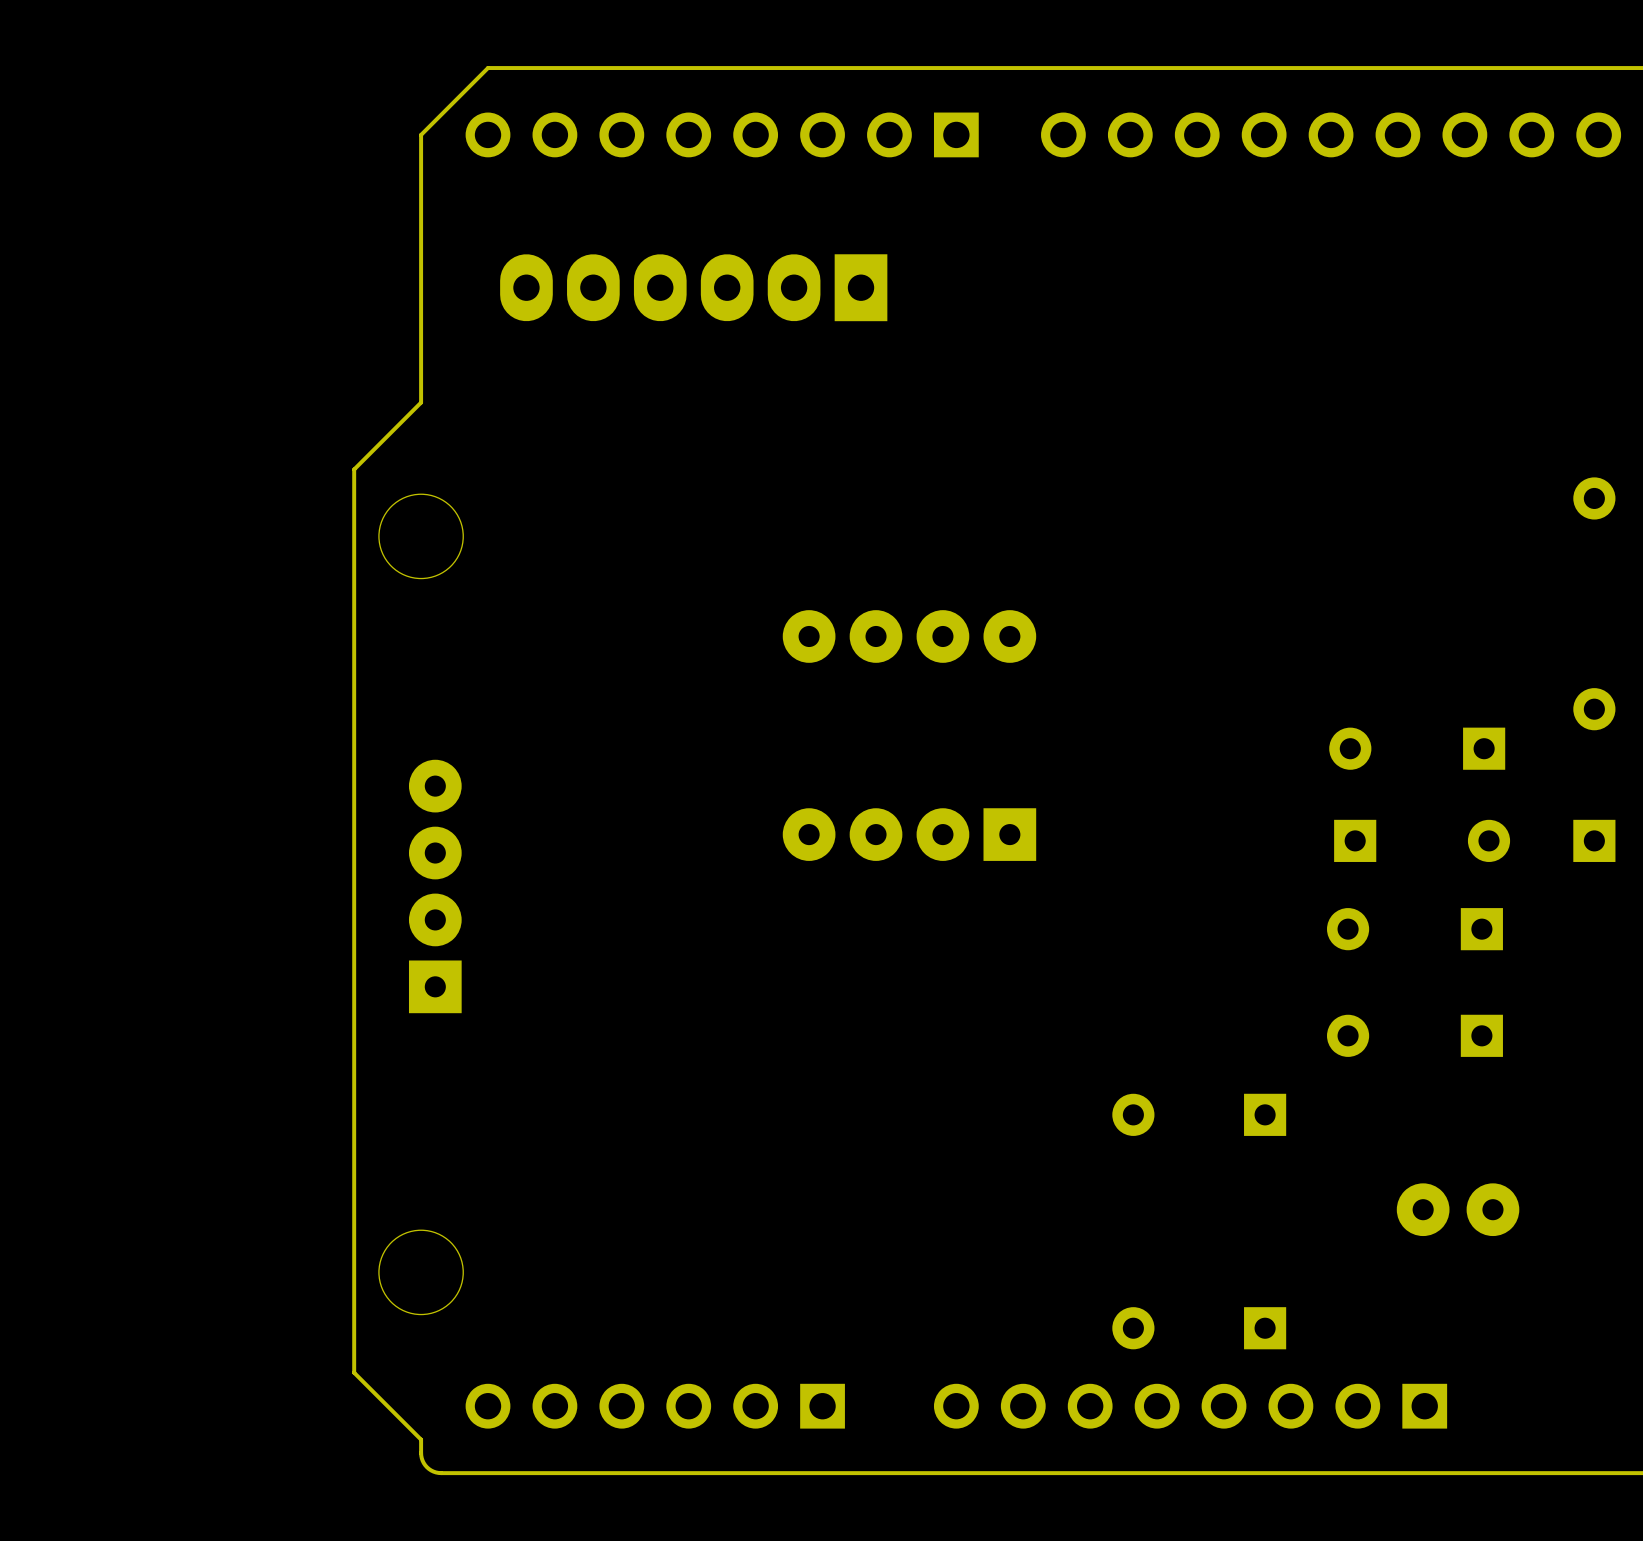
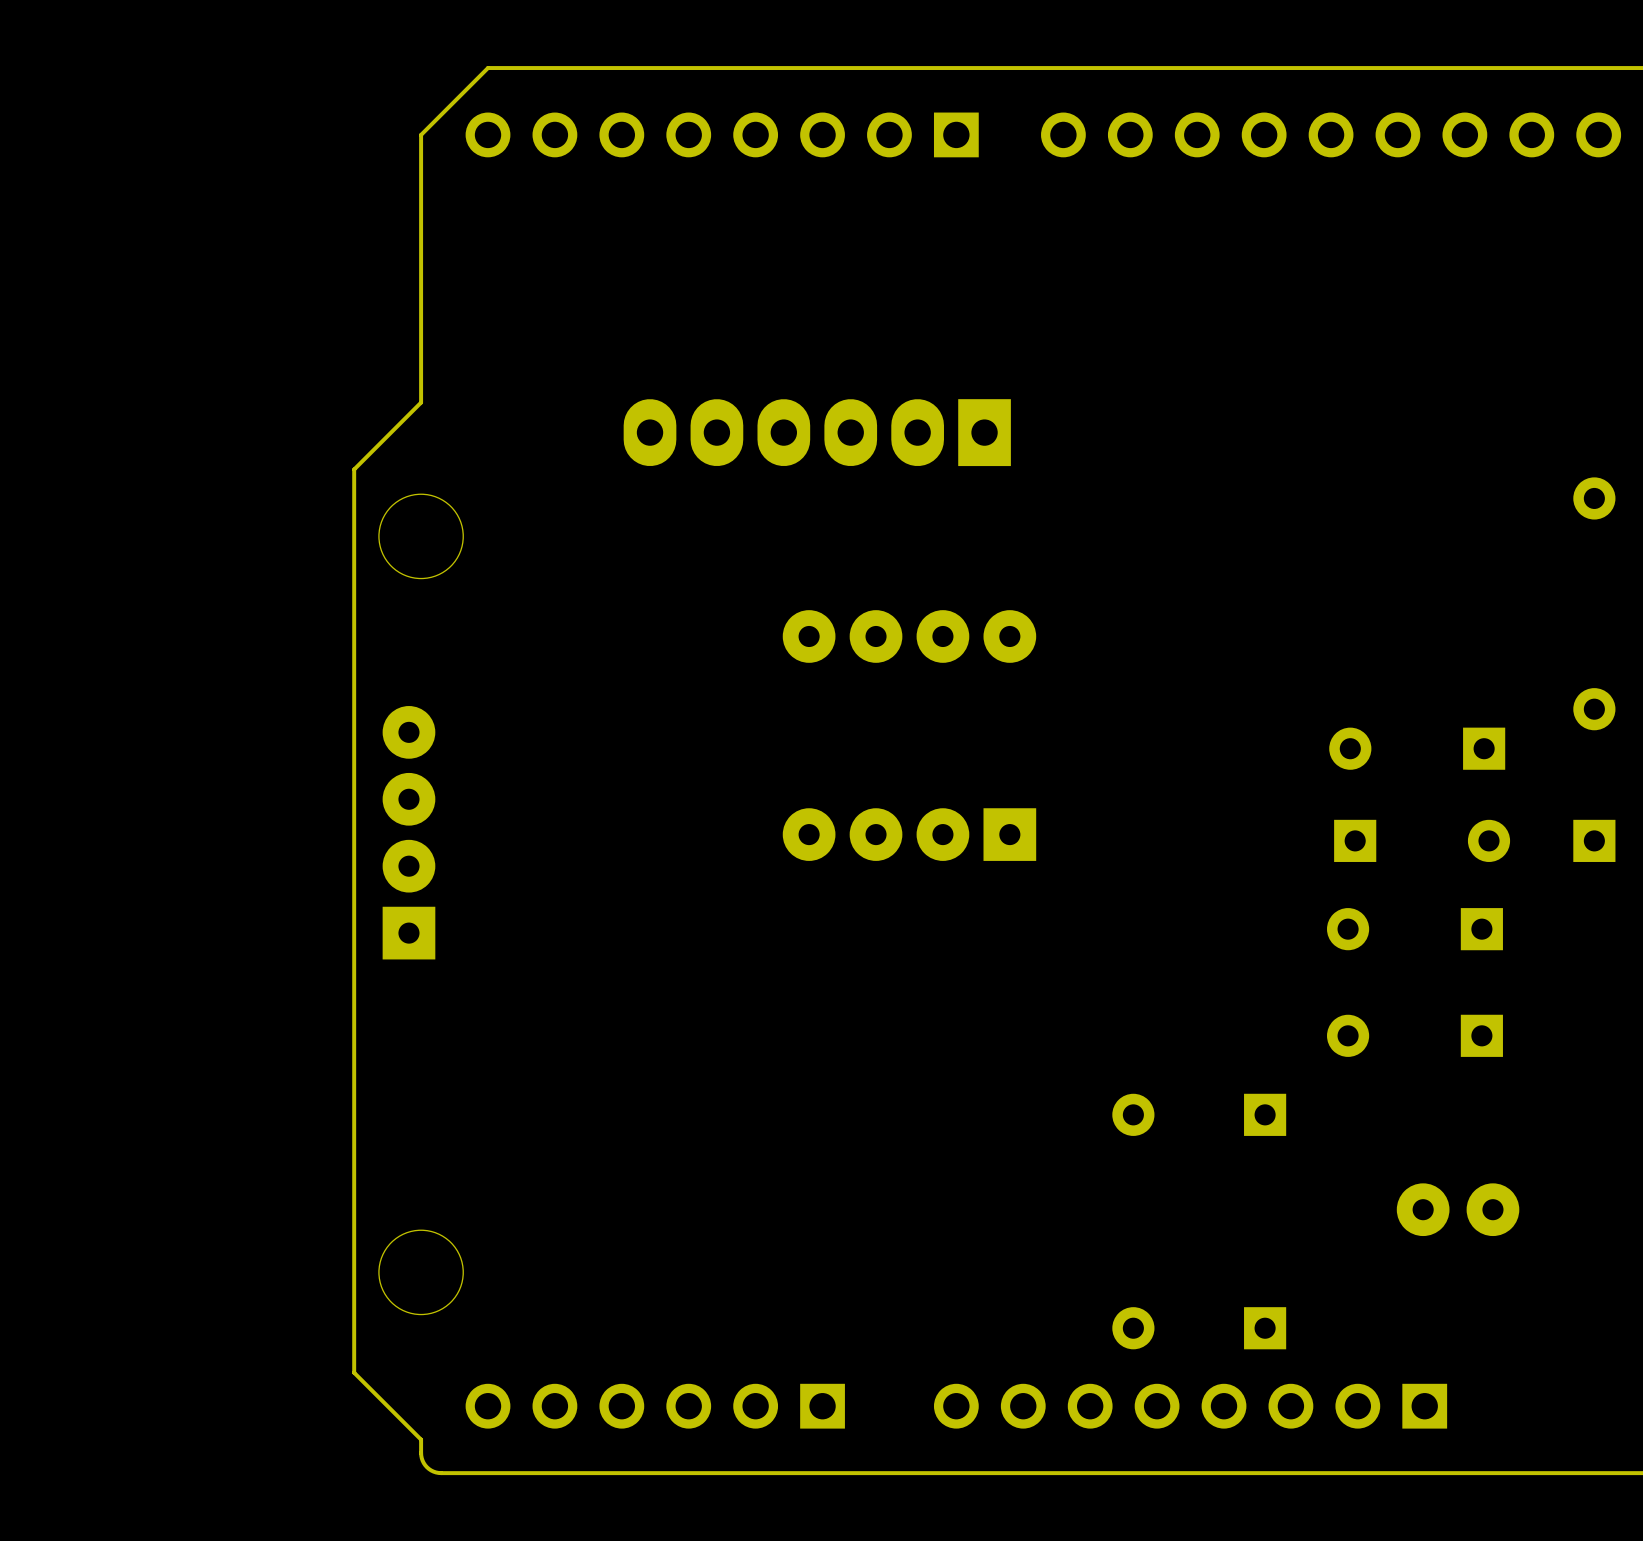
part position: (693, 287) -> (817, 432)
part position: (435, 886) -> (408, 832)

